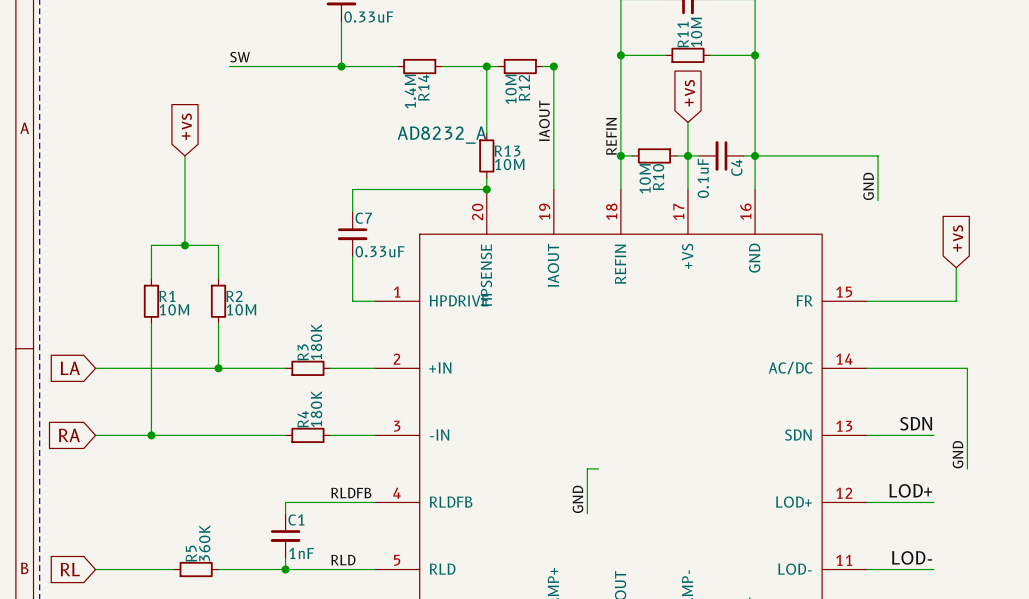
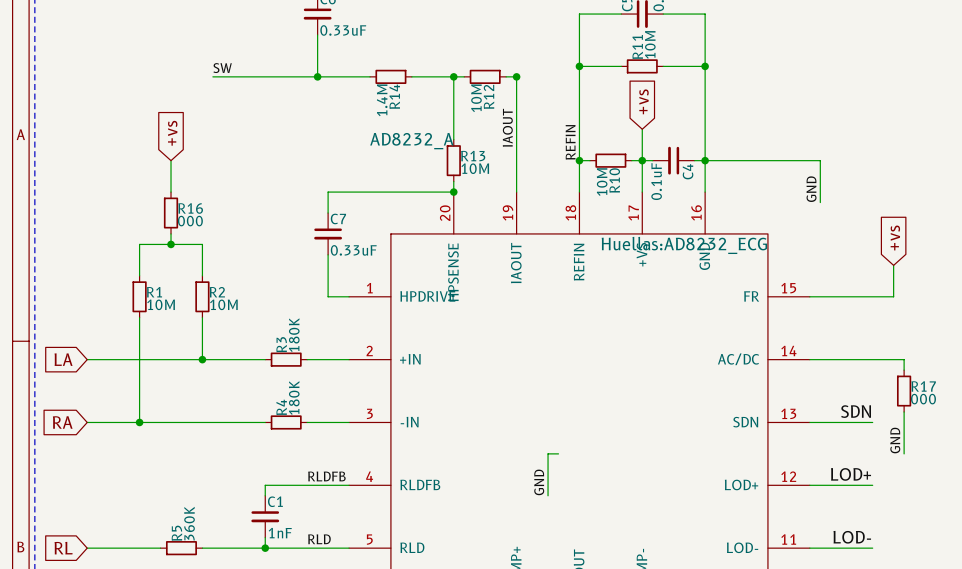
wire: (184, 189) (184, 234) -> none
R16: none -> 000 (171, 213)
part text: none -> Huellas:AD8232_ECG (684, 245)
wire: (967, 379) (967, 424) -> none
R17: none -> 000 (904, 391)

